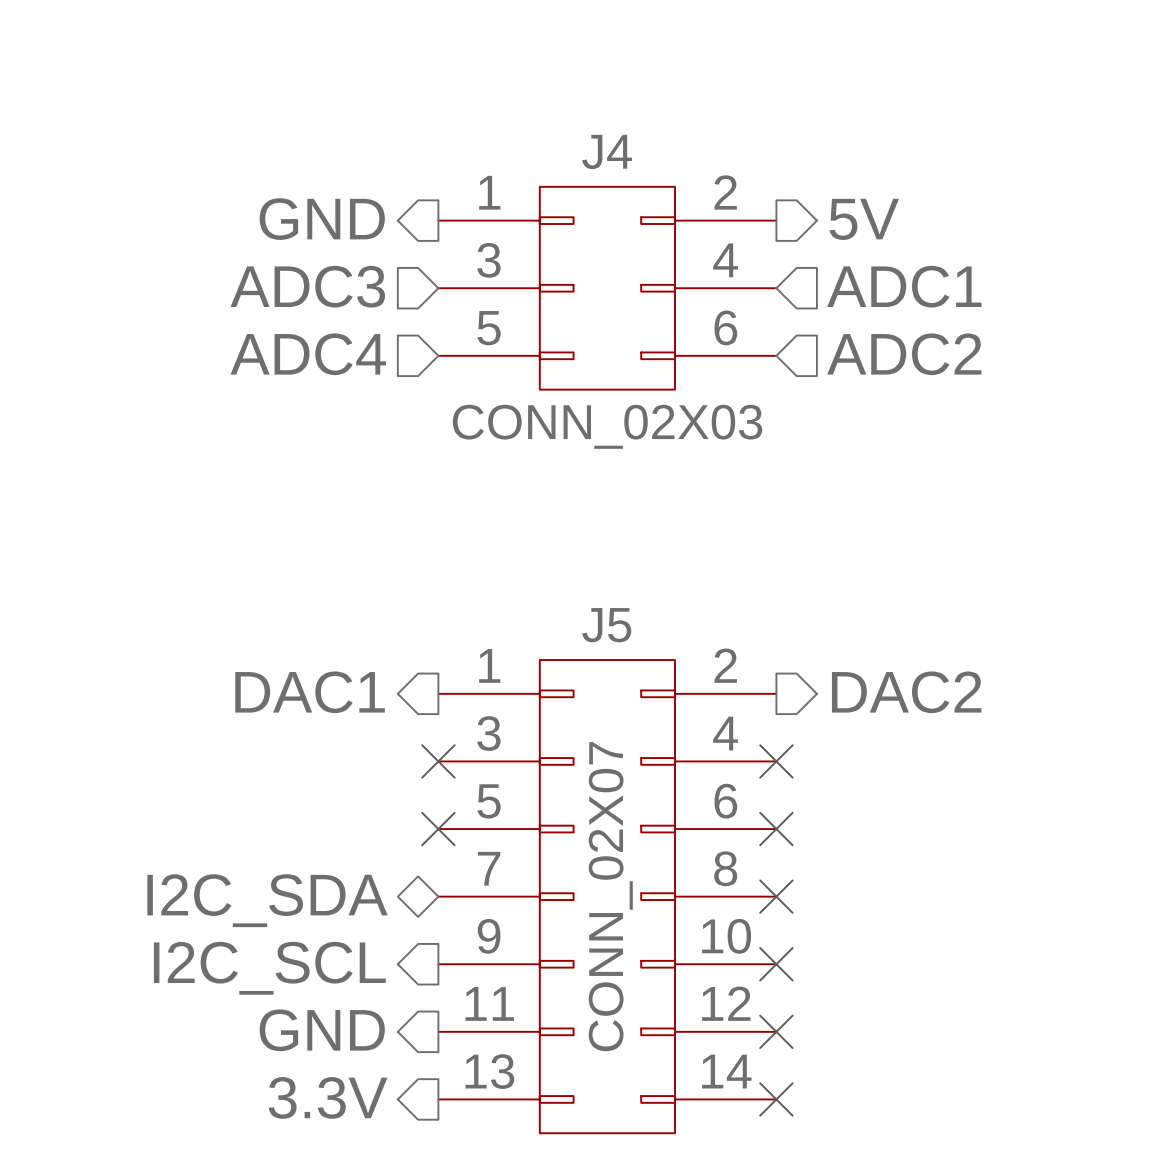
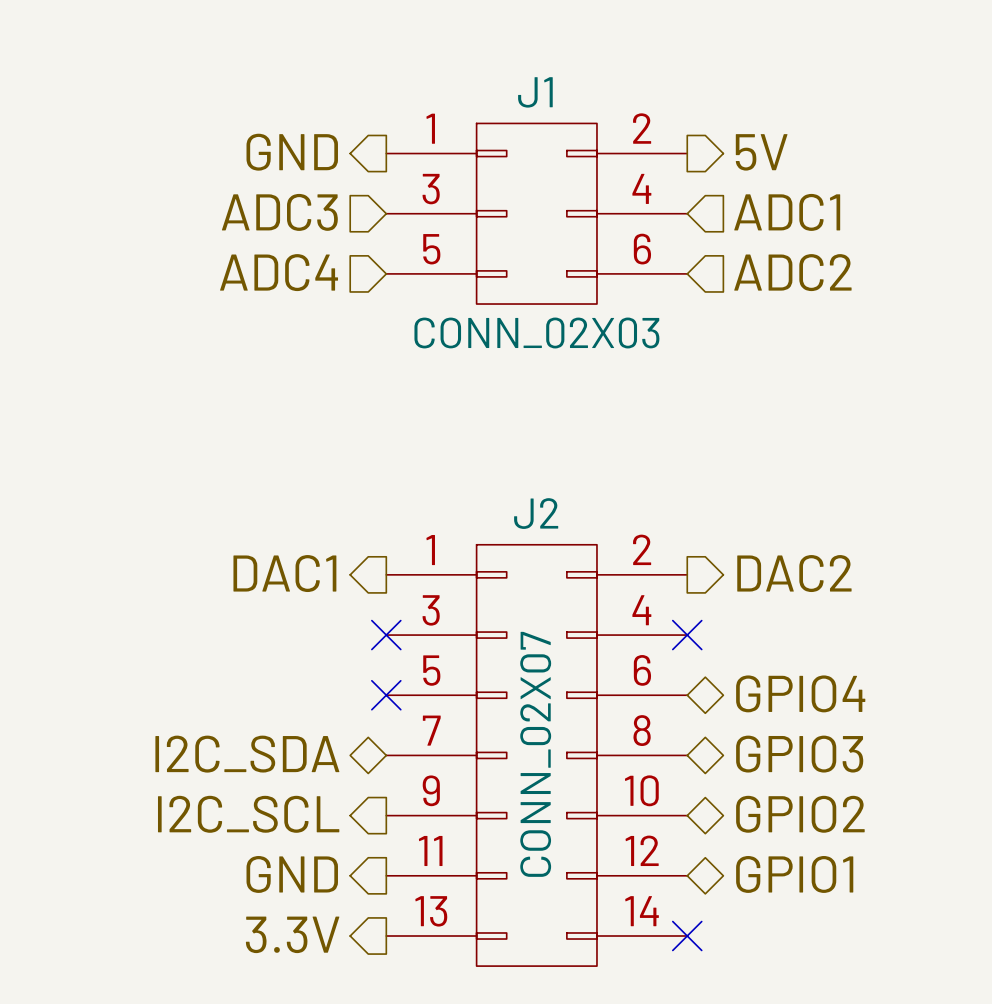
J4 name: J4 (607, 152) -> J1 (535, 92)
J5 name: J5 (606, 625) -> J2 (536, 513)
hierarchical label: none -> GPIO4 (800, 693)
no-connect mark: (776, 829) -> none
hierarchical label: none -> GPIO3 (799, 754)
no-connect mark: (776, 896) -> none
hierarchical label: none -> GPIO2 (800, 814)
no-connect mark: (776, 964) -> none
hierarchical label: none -> GPIO1 (794, 874)
no-connect mark: (776, 1031) -> none

